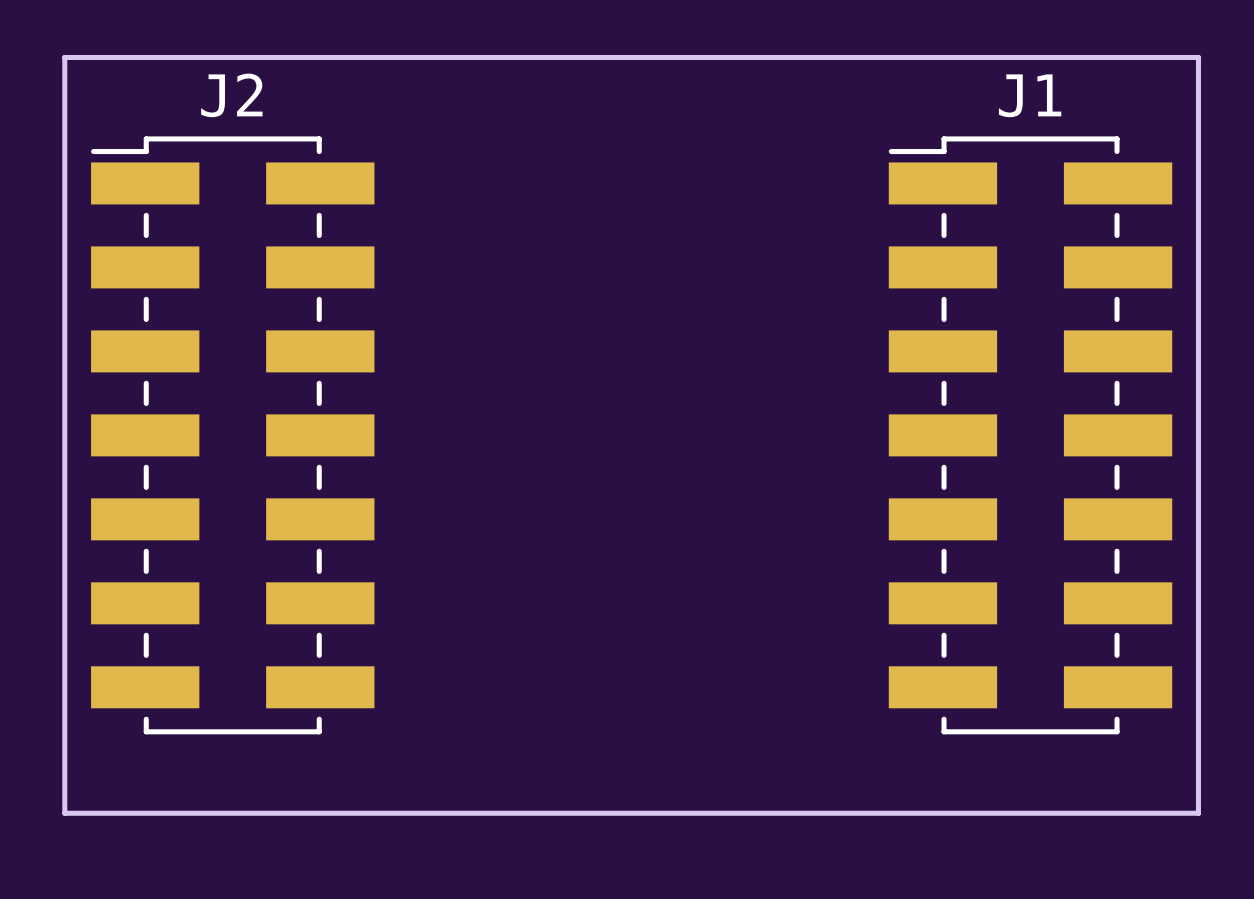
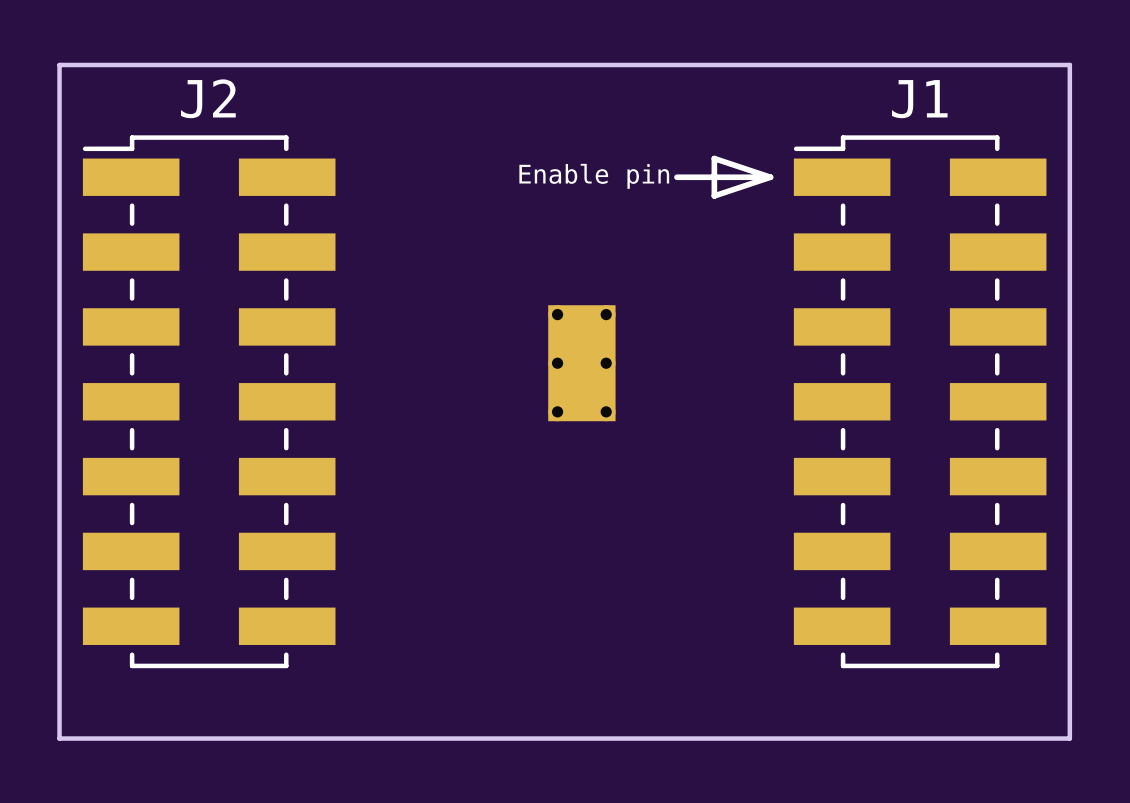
text: none -> Enable pin (594, 176)
line: none -> (770, 177) (676, 177)
line: none -> (770, 177) (714, 158) (714, 195) (770, 177)
part: none -> (581, 363)

